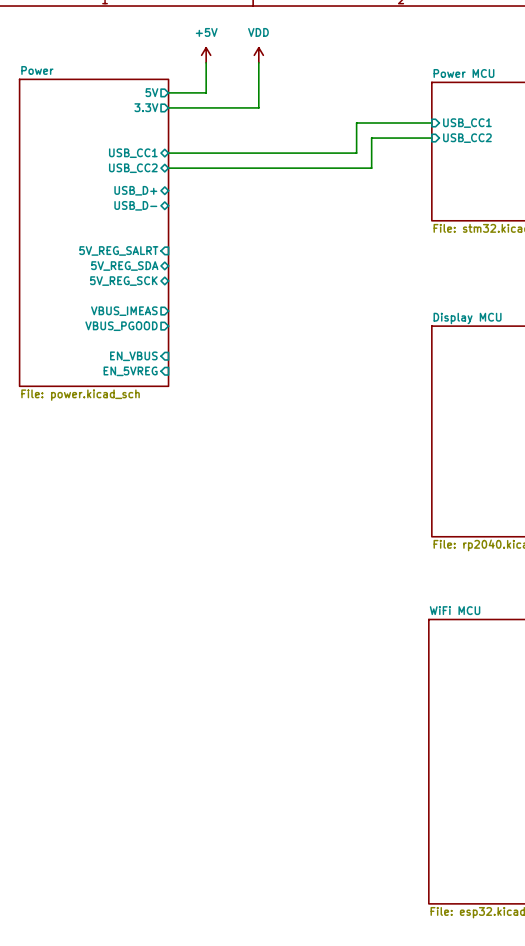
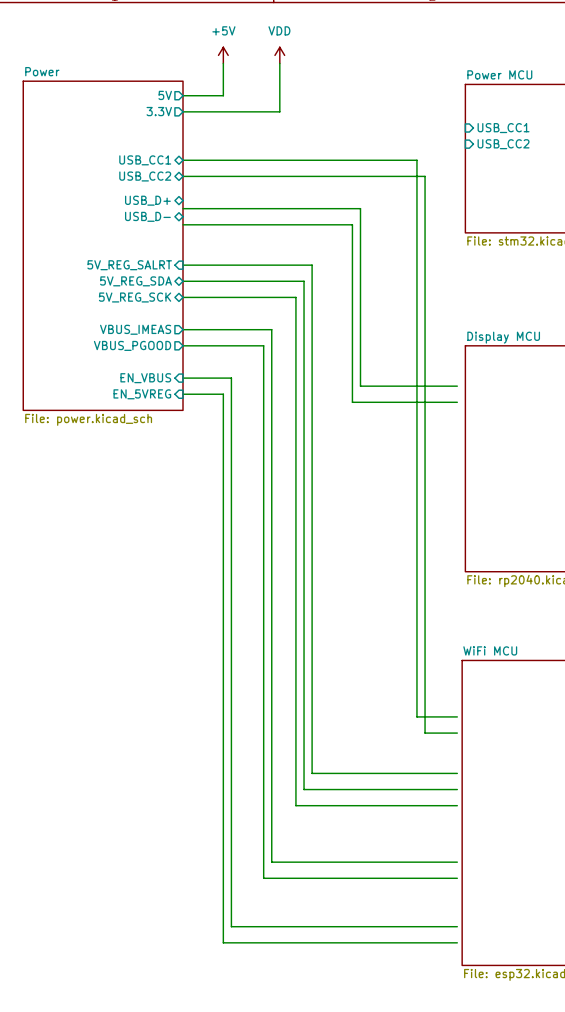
wire: (431, 123) (356, 123) (356, 153) -> (457, 716) (416, 716) (416, 160) (384, 160)
wire: (431, 138) (371, 138) (371, 168) -> (457, 733) (425, 733) (425, 176) (400, 176)
wire: none -> (183, 208) (360, 208) (360, 386) (457, 386)
wire: none -> (183, 224) (352, 224) (352, 402) (457, 402)
wire: none -> (183, 265) (312, 265) (312, 773) (457, 773)
wire: none -> (183, 281) (304, 281) (304, 789) (457, 789)
wire: none -> (183, 297) (295, 297) (295, 805) (457, 805)
wire: none -> (183, 329) (271, 329) (271, 862) (457, 862)
wire: none -> (183, 345) (263, 345) (263, 878) (457, 878)
wire: none -> (183, 378) (231, 378) (231, 926) (457, 926)
wire: none -> (183, 394) (223, 394) (223, 942) (457, 942)

